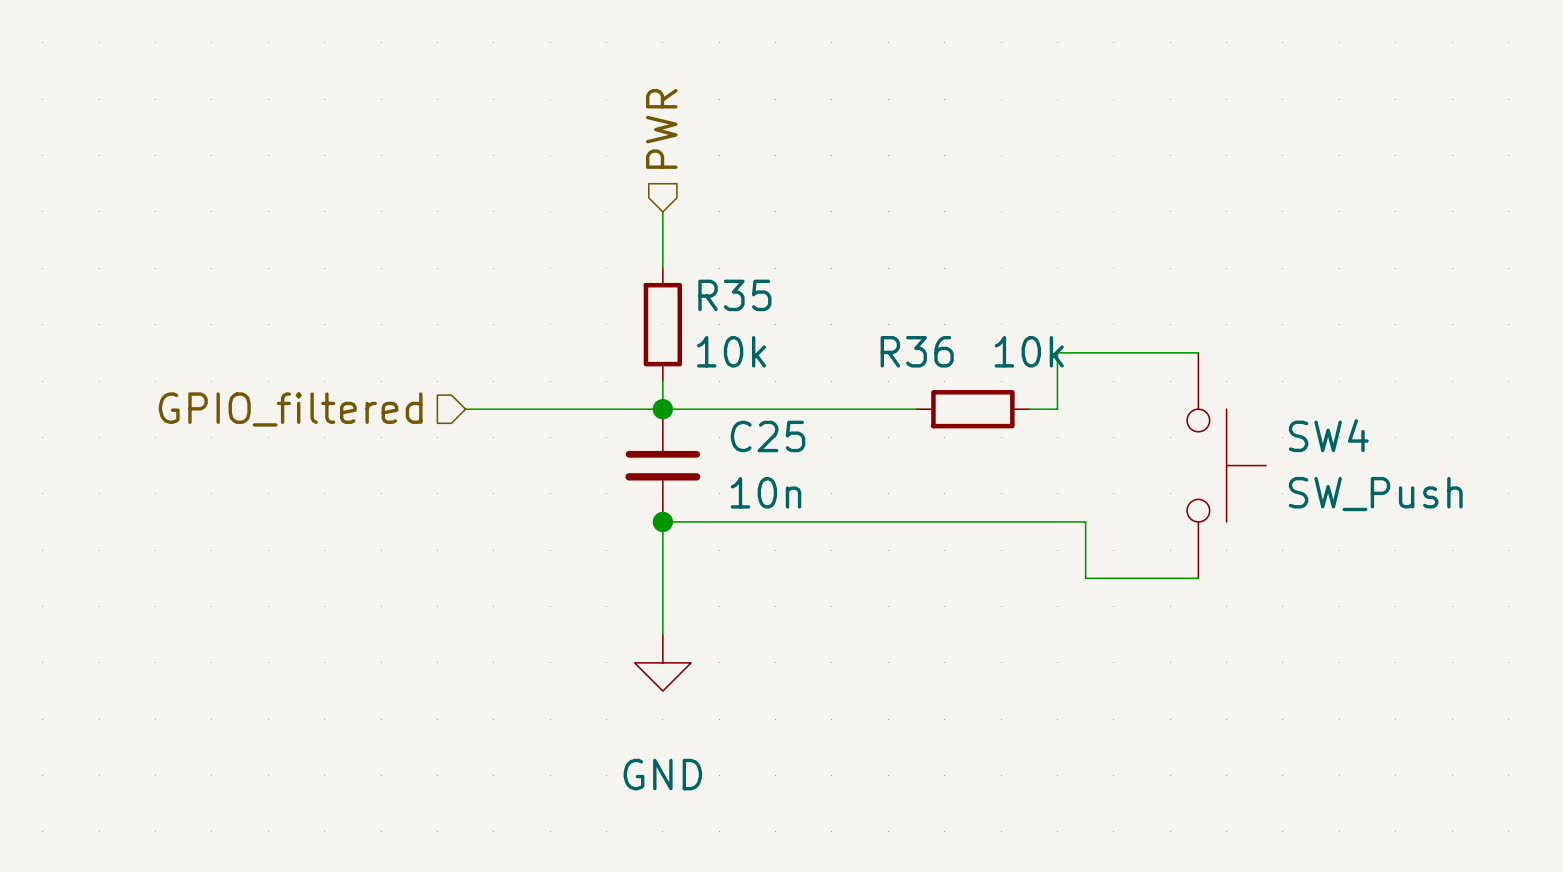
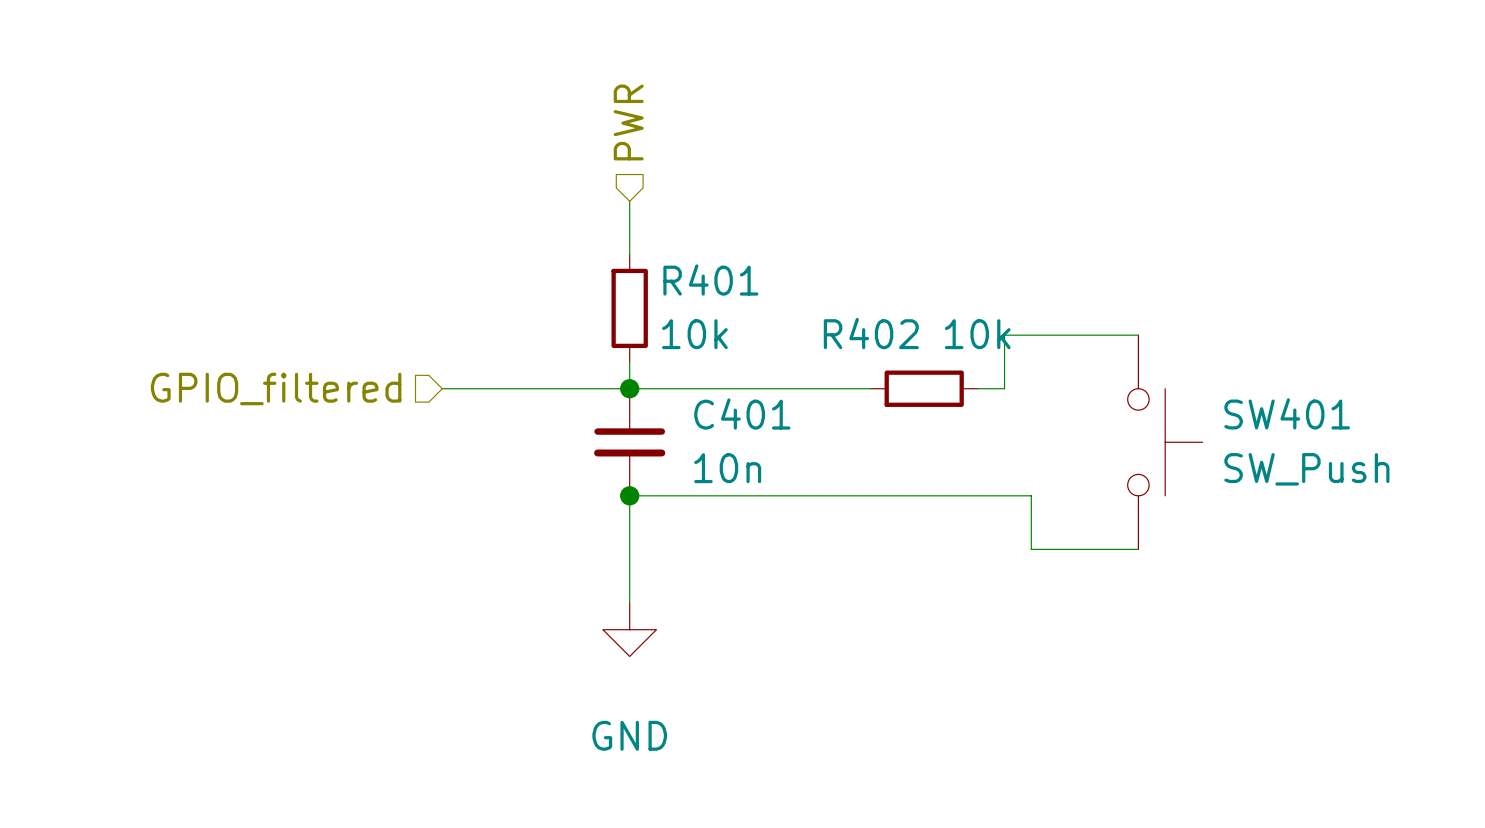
R35 name: R35 (734, 295) -> R401 (710, 279)
R36 name: R36 (917, 351) -> R402 (871, 333)
SW4 name: SW4 (1328, 435) -> SW401 (1287, 413)
C25 name: C25 (768, 436) -> C401 (742, 413)

